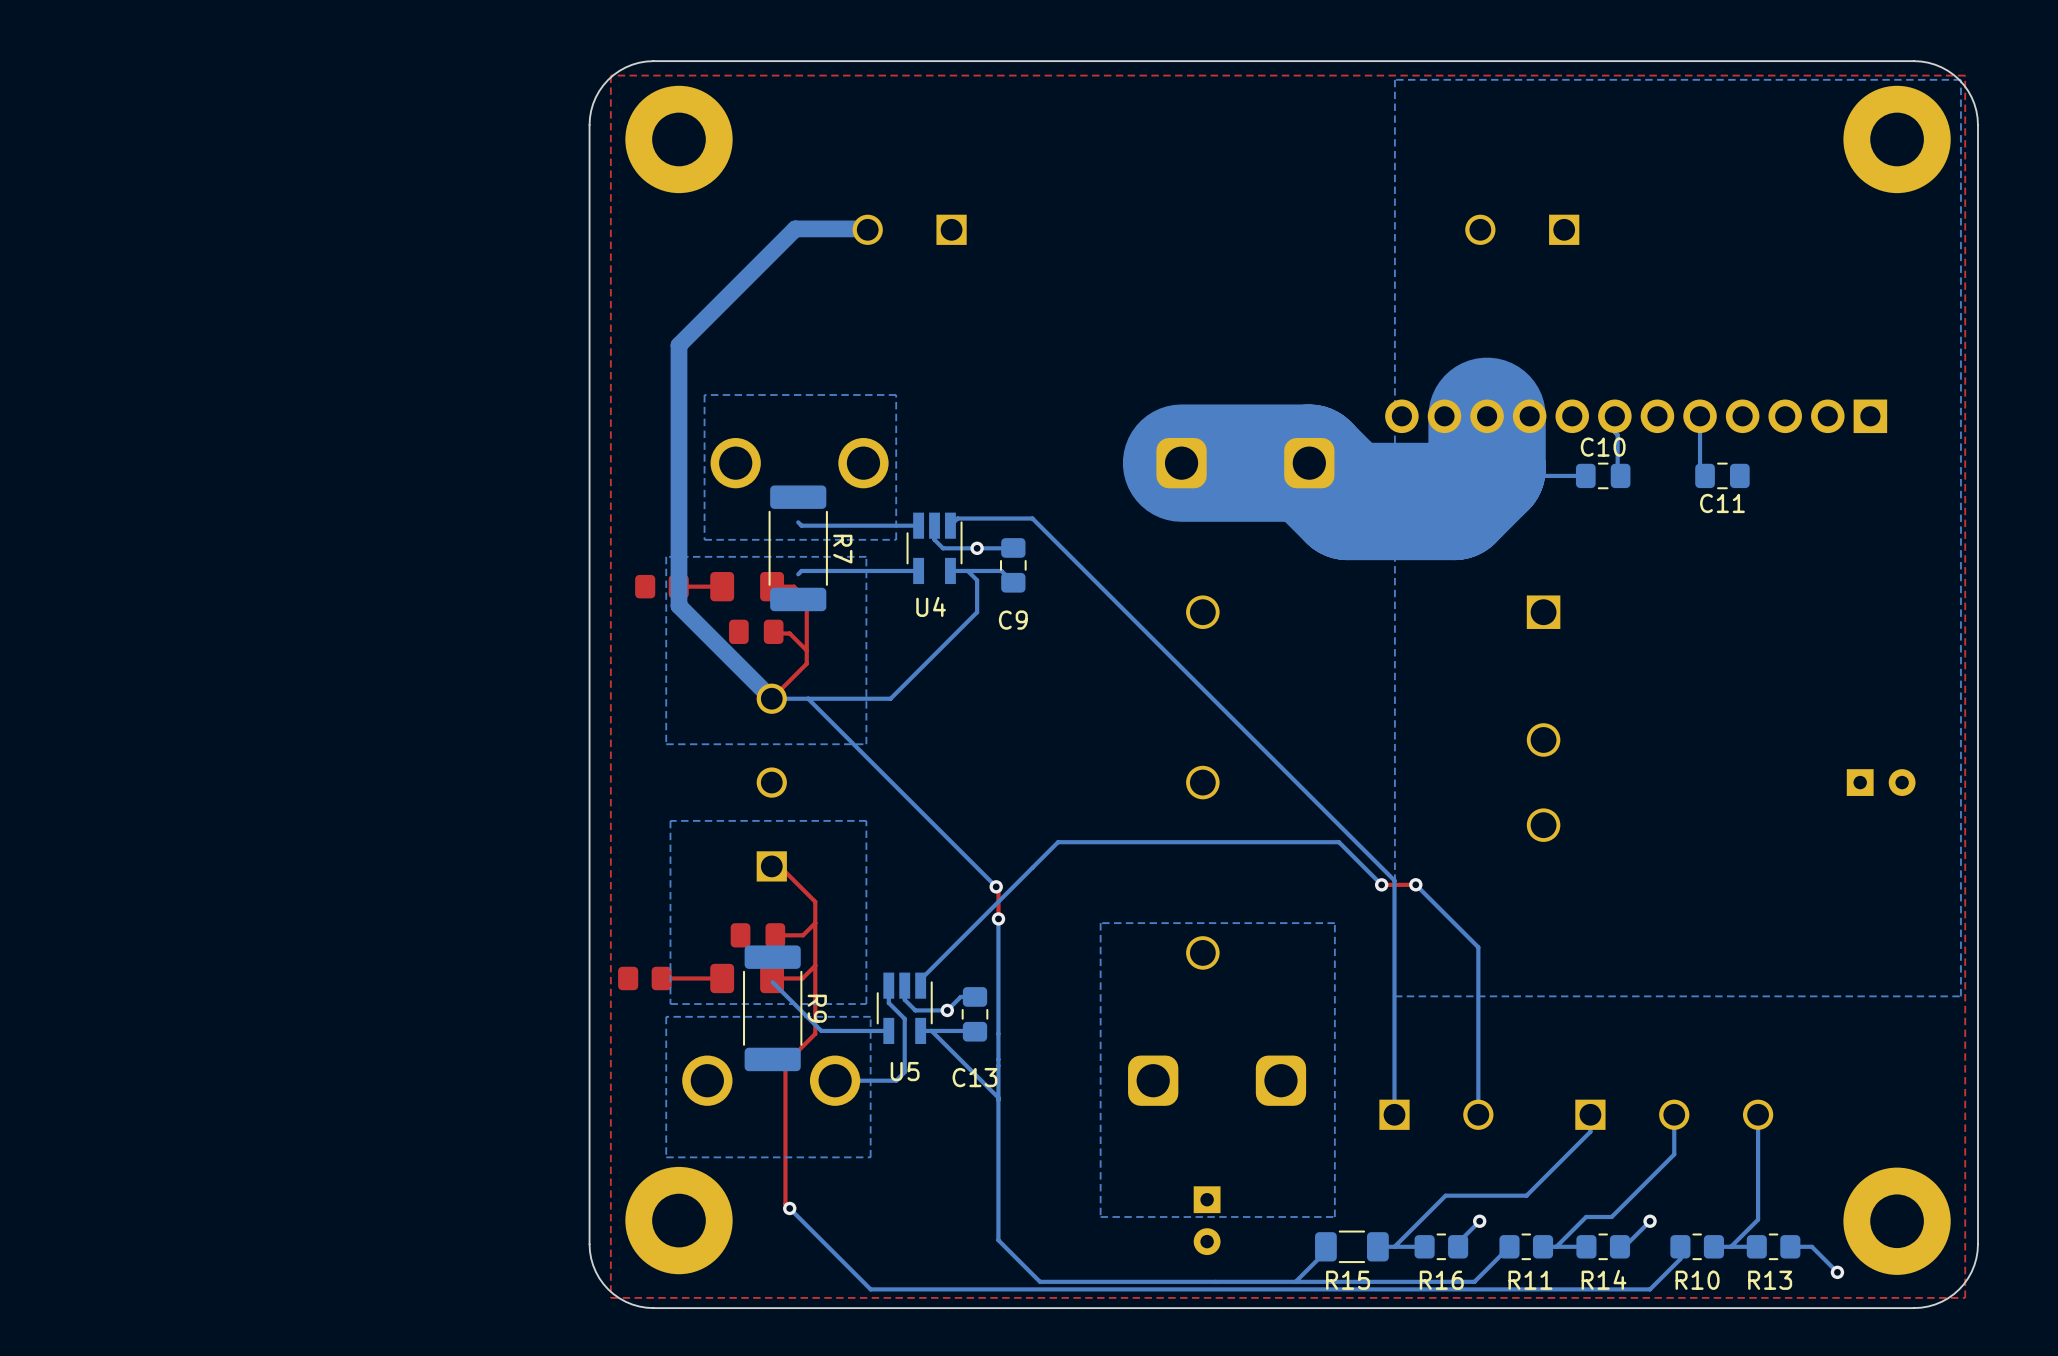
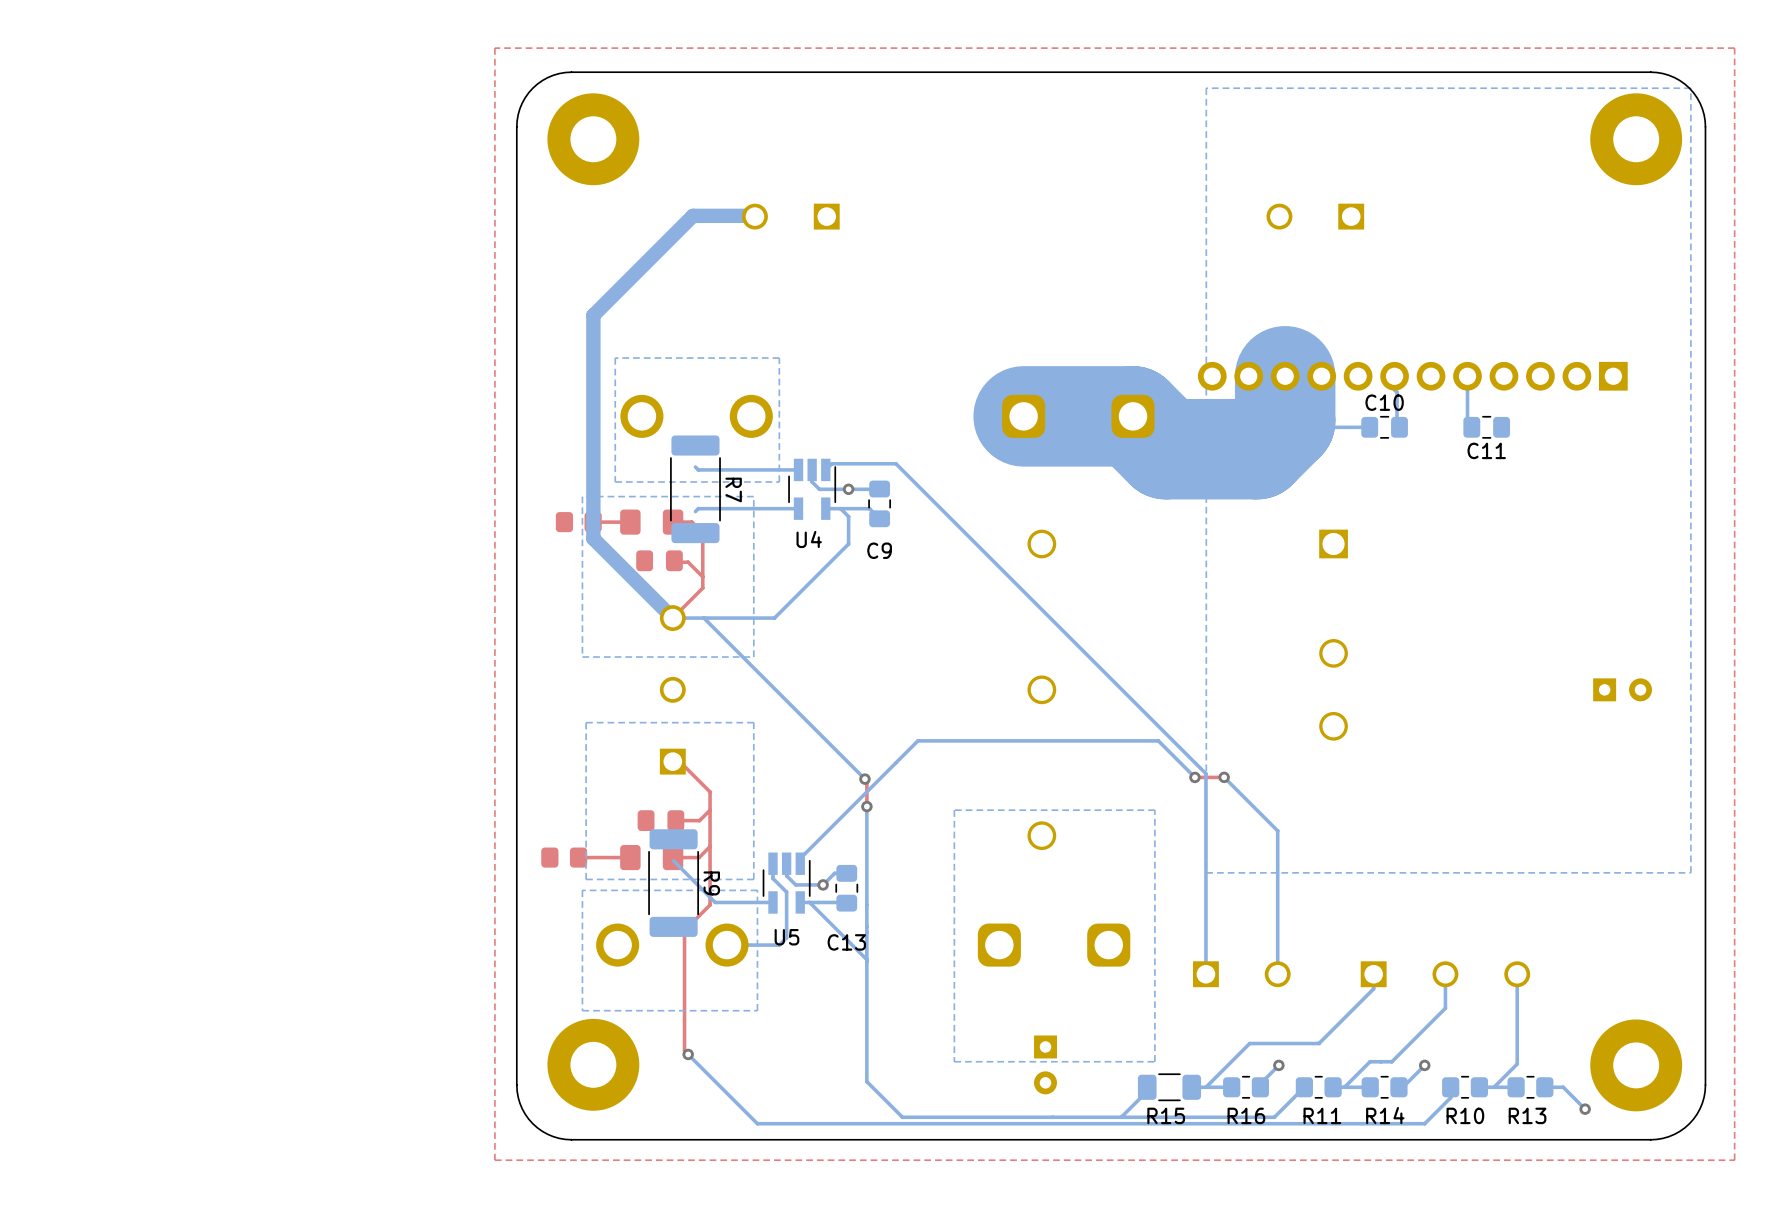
top zone outline: (1965, 75) (1965, 1297) (610, 1297) (610, 75) (1965, 75) -> (1734, 48) (1734, 1160) (494, 1160) (494, 48) (1734, 48)

